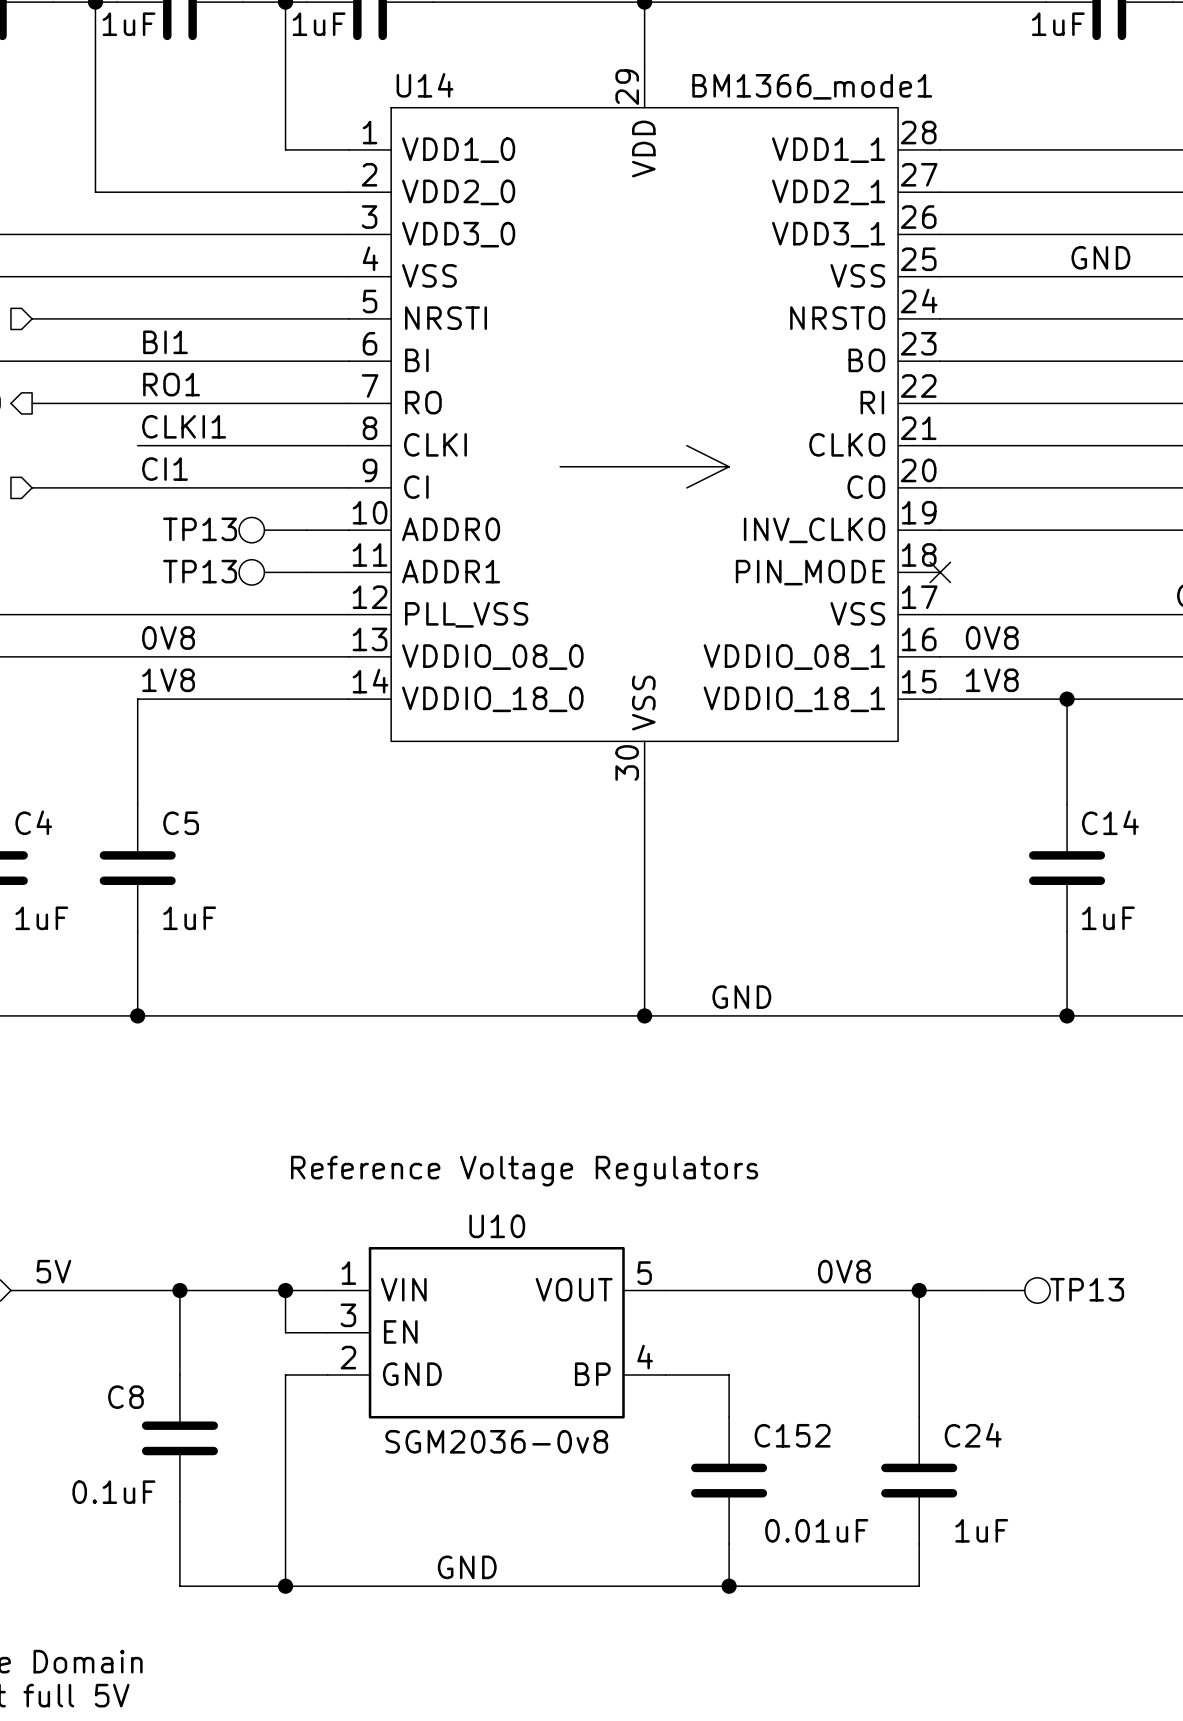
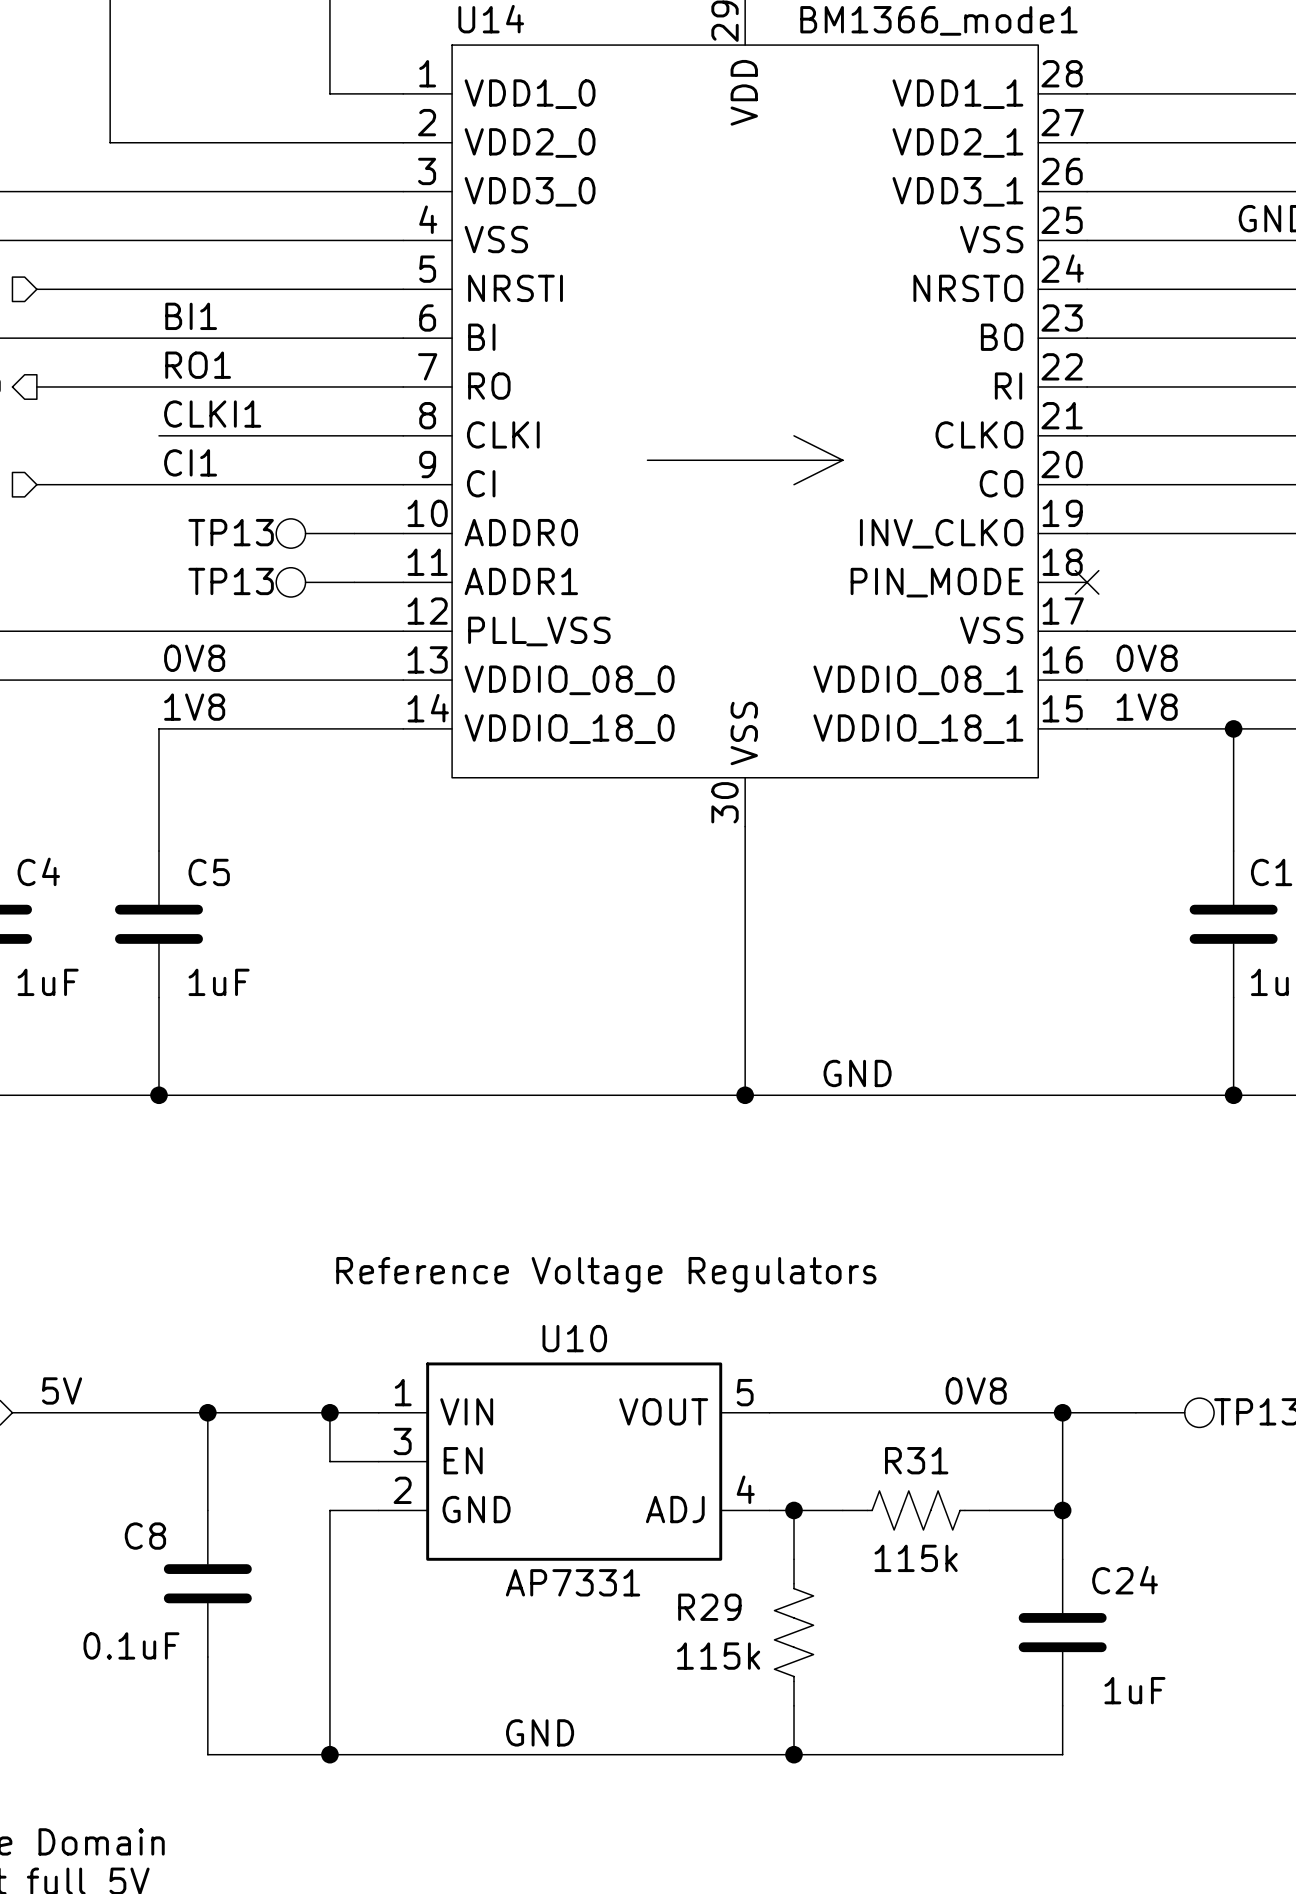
U10 pin name: BP (592, 1374) -> ADJ (675, 1509)
junction: none -> (794, 1510)
wire: (729, 1374) (729, 1417) -> (794, 1510) (794, 1559)
R31: none -> 115k (916, 1510)
wire: none -> (989, 1510) (1062, 1510)
junction: none -> (1062, 1510)
U10 value: SGM2036-0v8 (496, 1441) -> AP7331 (573, 1582)
R29: none -> 115k (794, 1632)
C152: 0.01uF (729, 1480) -> none
wire: (729, 1543) (729, 1586) -> (794, 1705) (794, 1754)
junction position: (729, 1586) -> (794, 1754)

